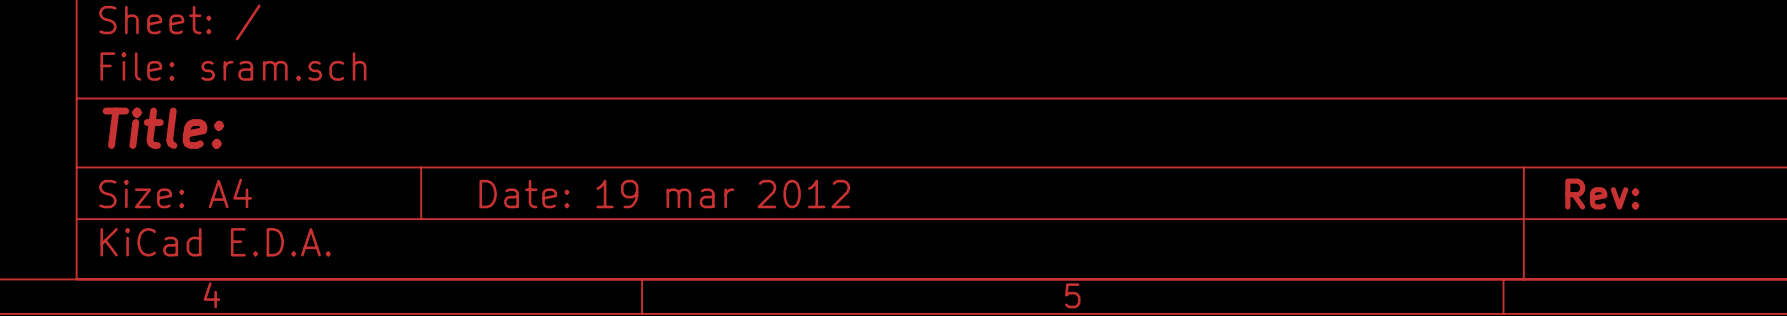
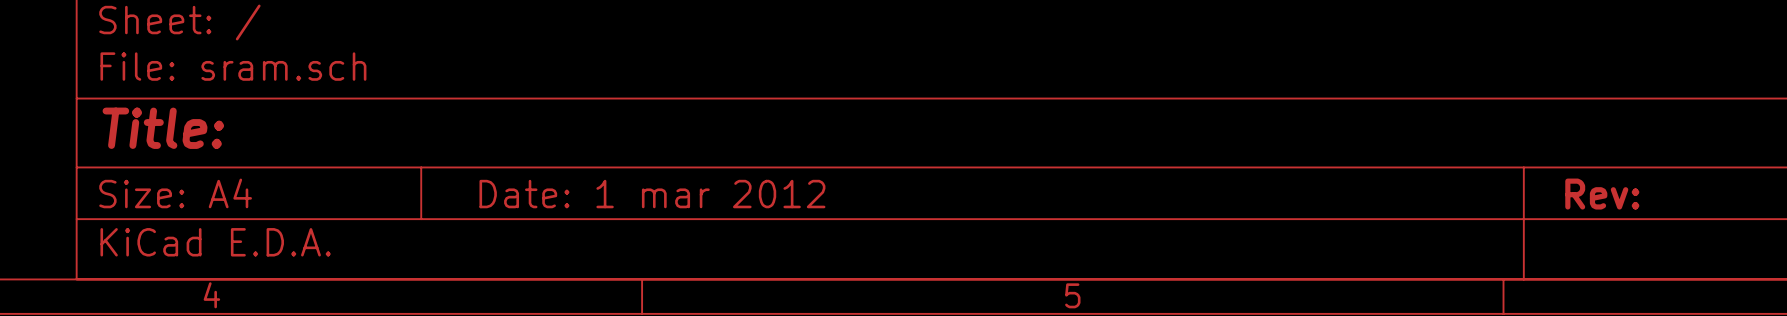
title block: Date: 19 mar 2012 (664, 194) -> Date: 1 mar 2012 (652, 194)

